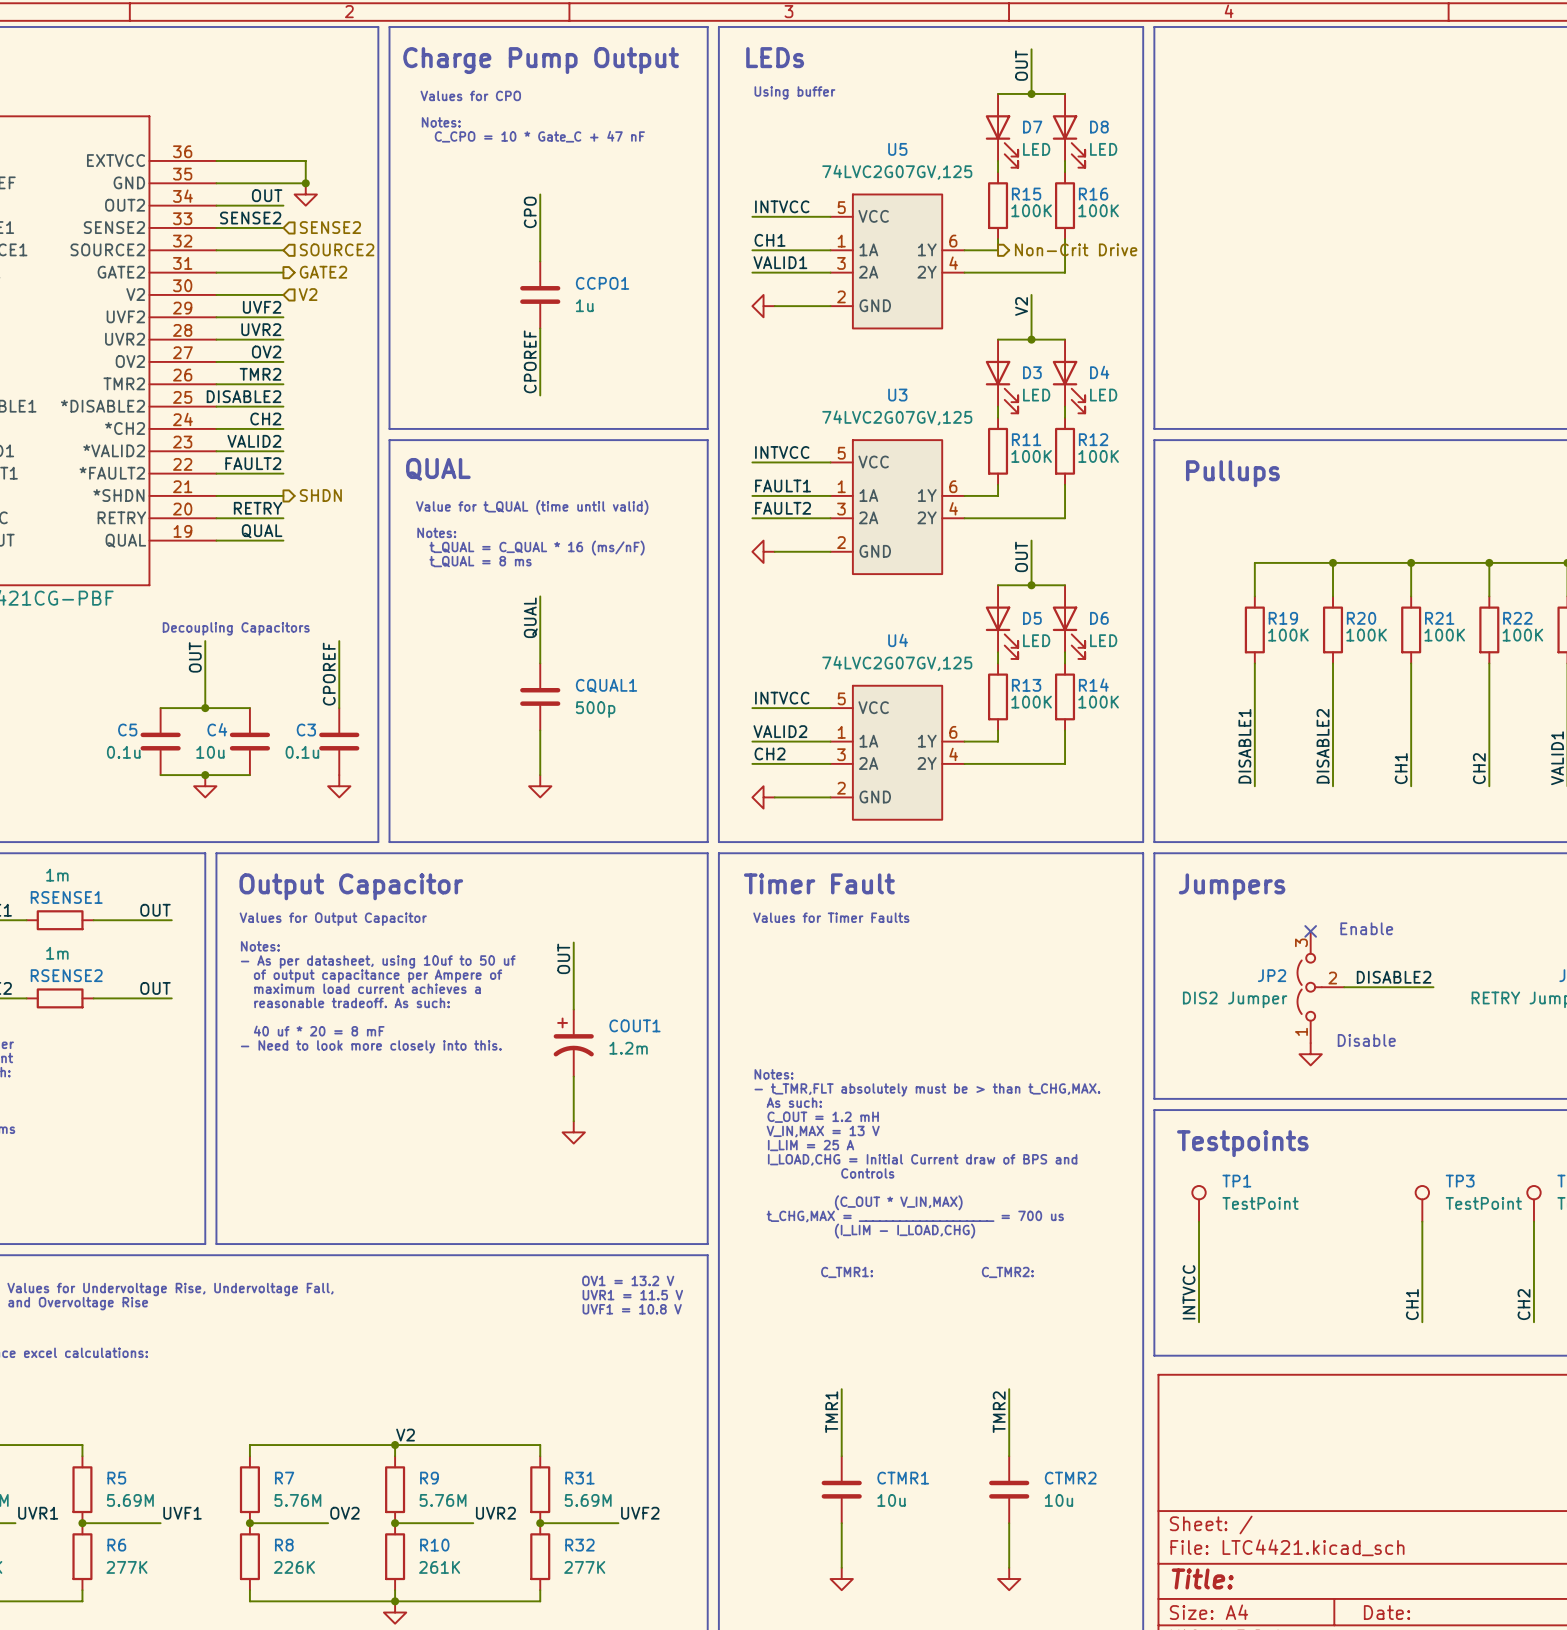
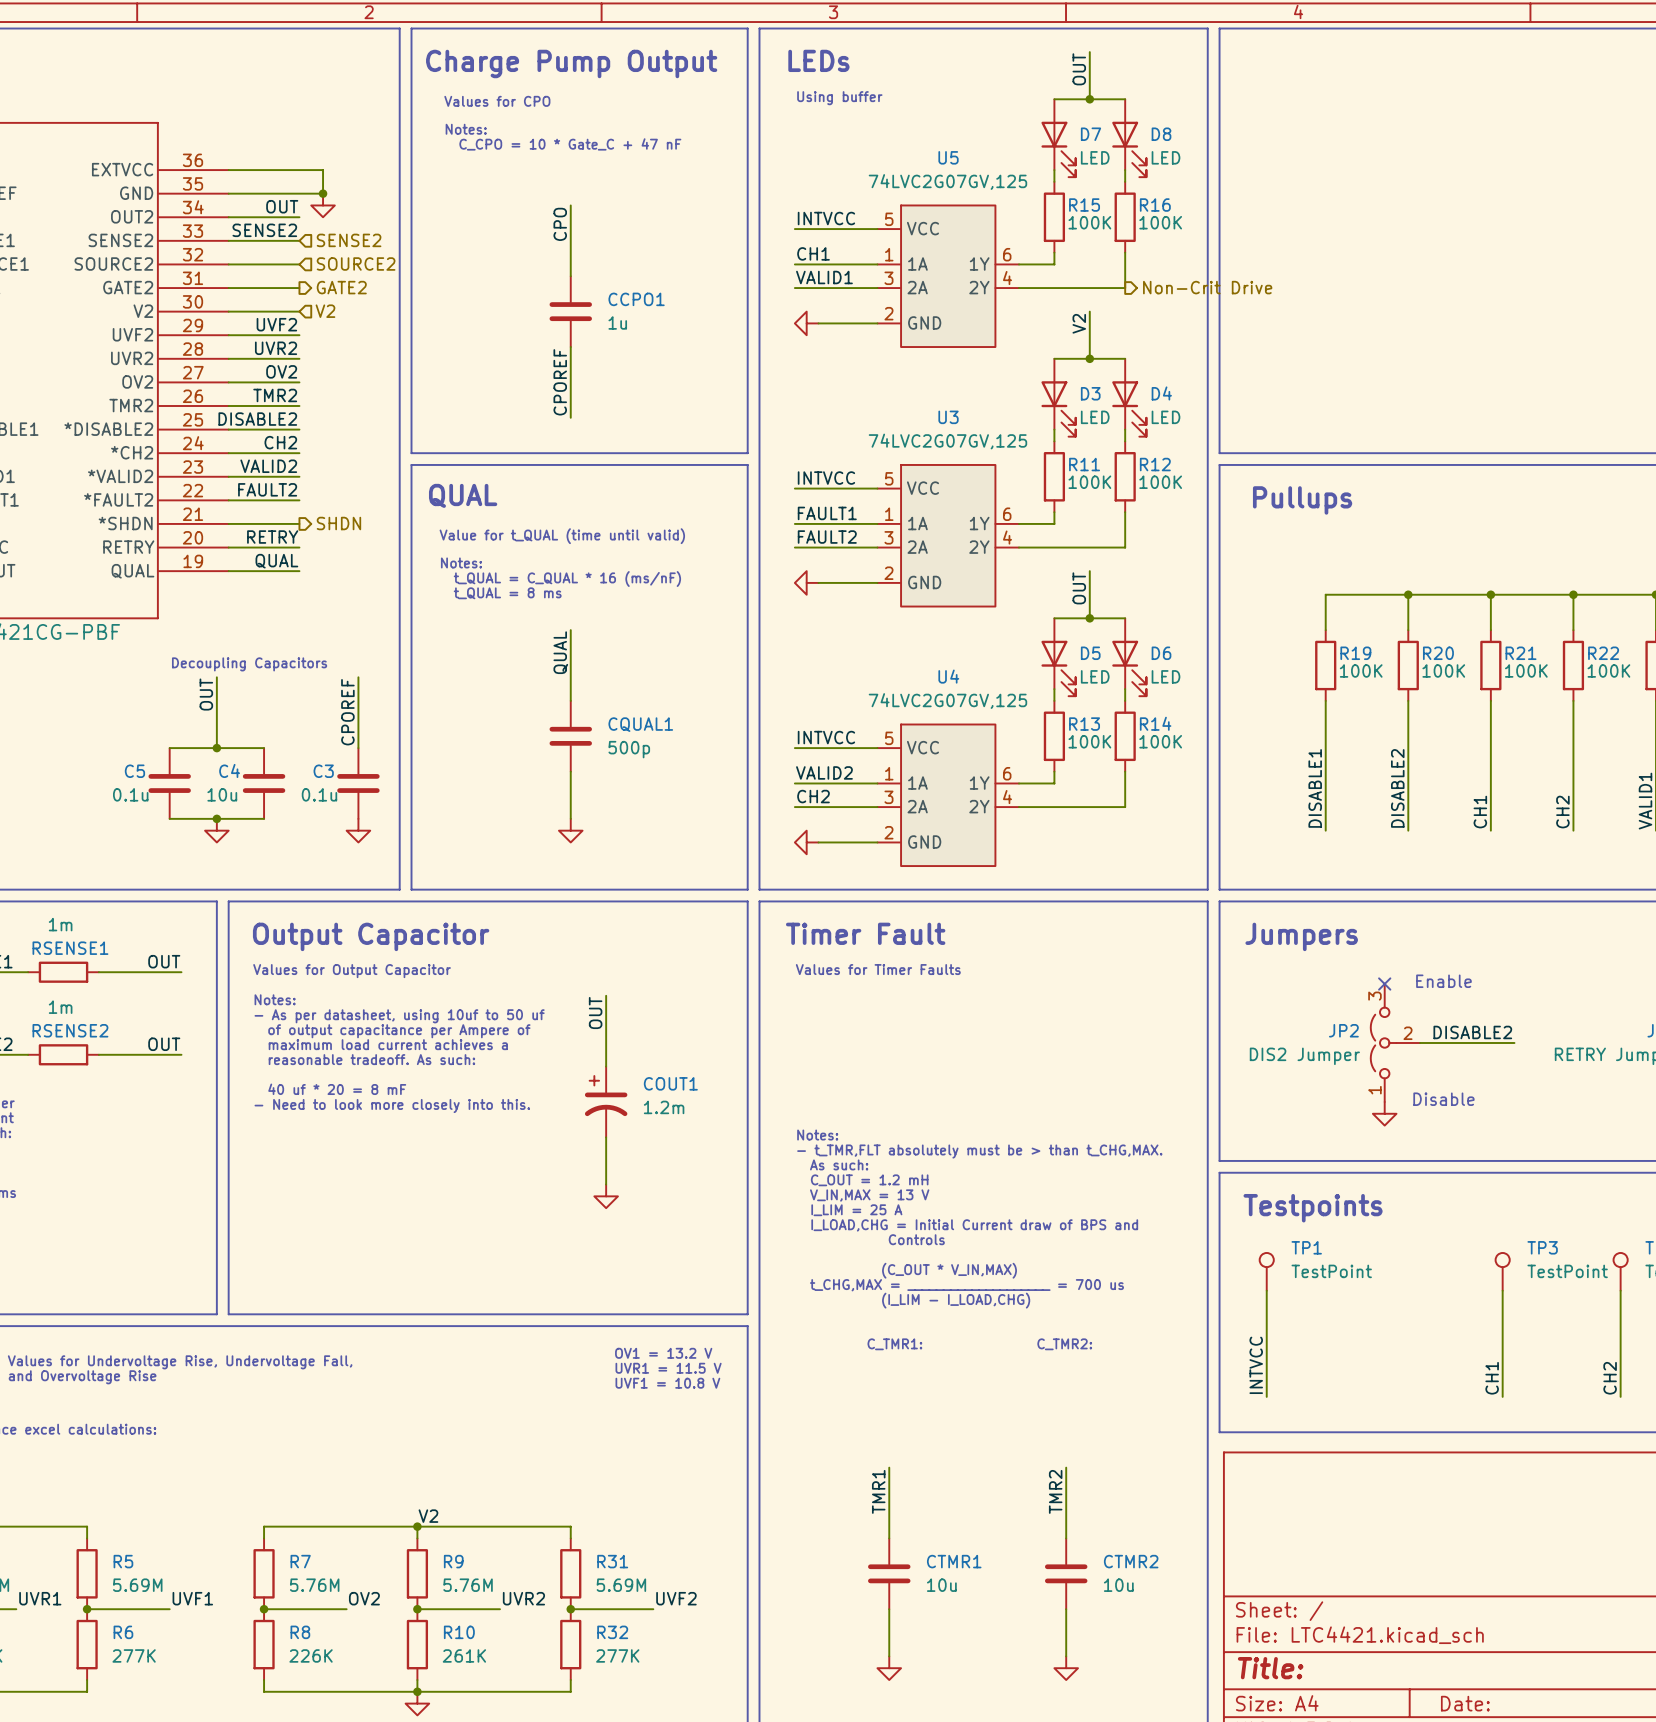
hierarchical label position: Non-Crit Drive (1076, 249) -> Non-Crit Drive (1207, 287)

